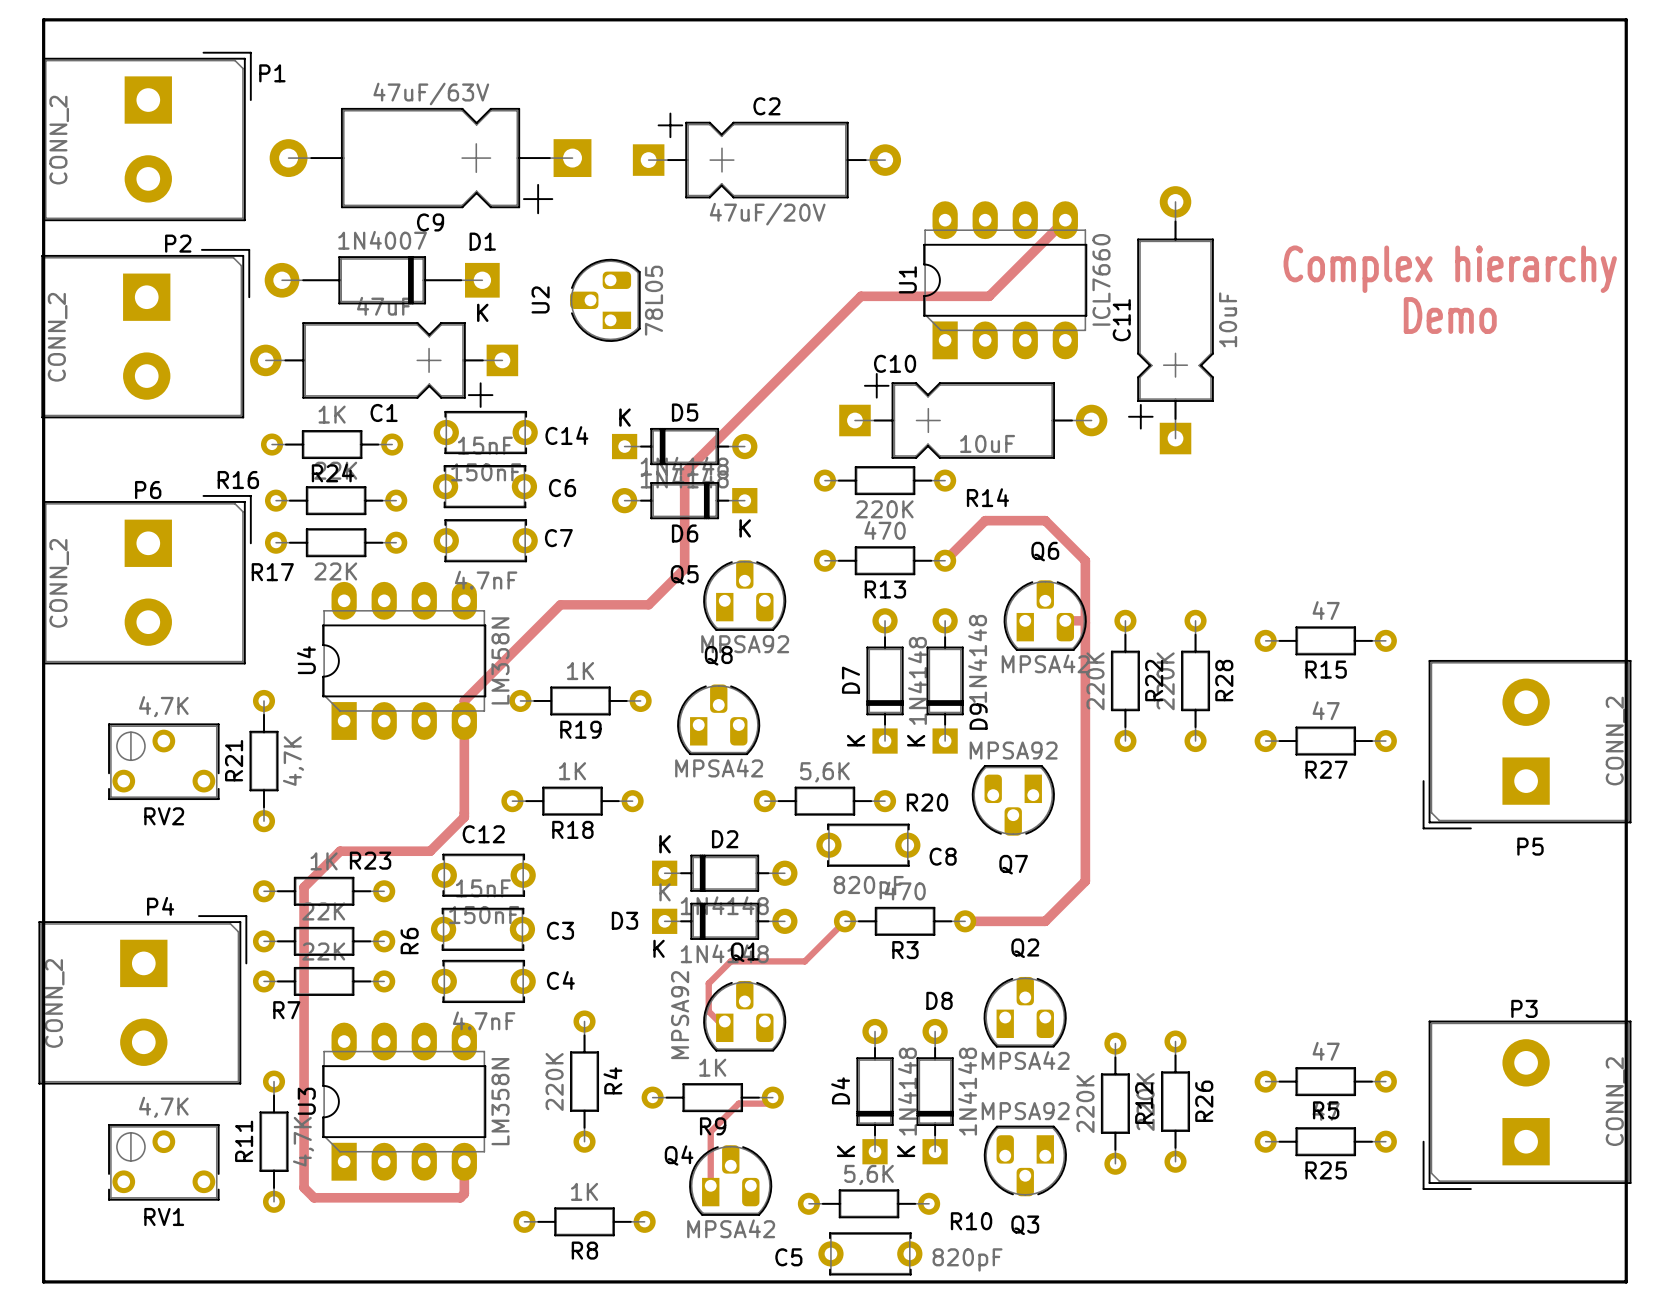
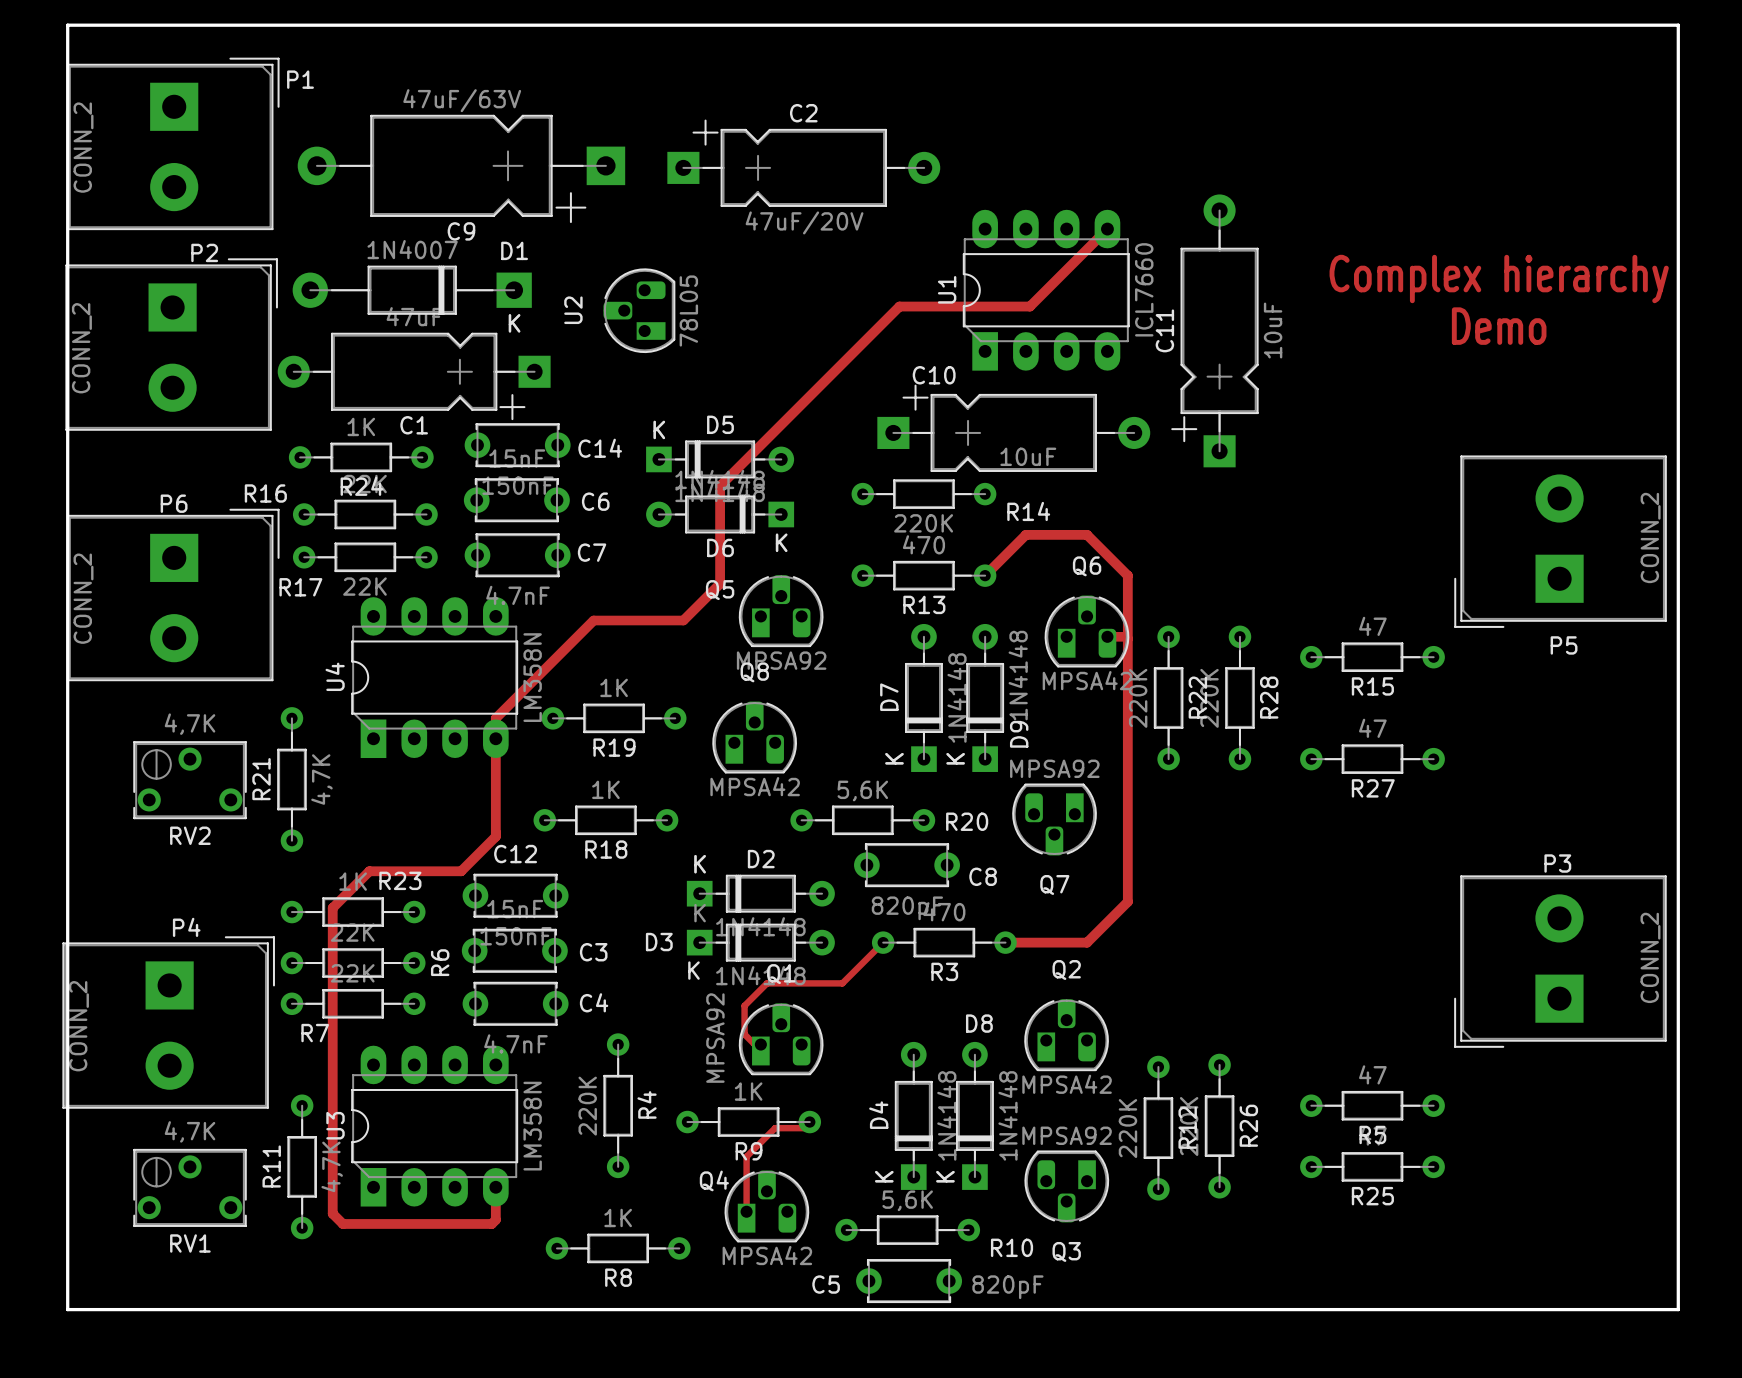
P5 position: (1527, 744) -> (1560, 541)
P3 position: (1527, 1105) -> (1560, 961)

